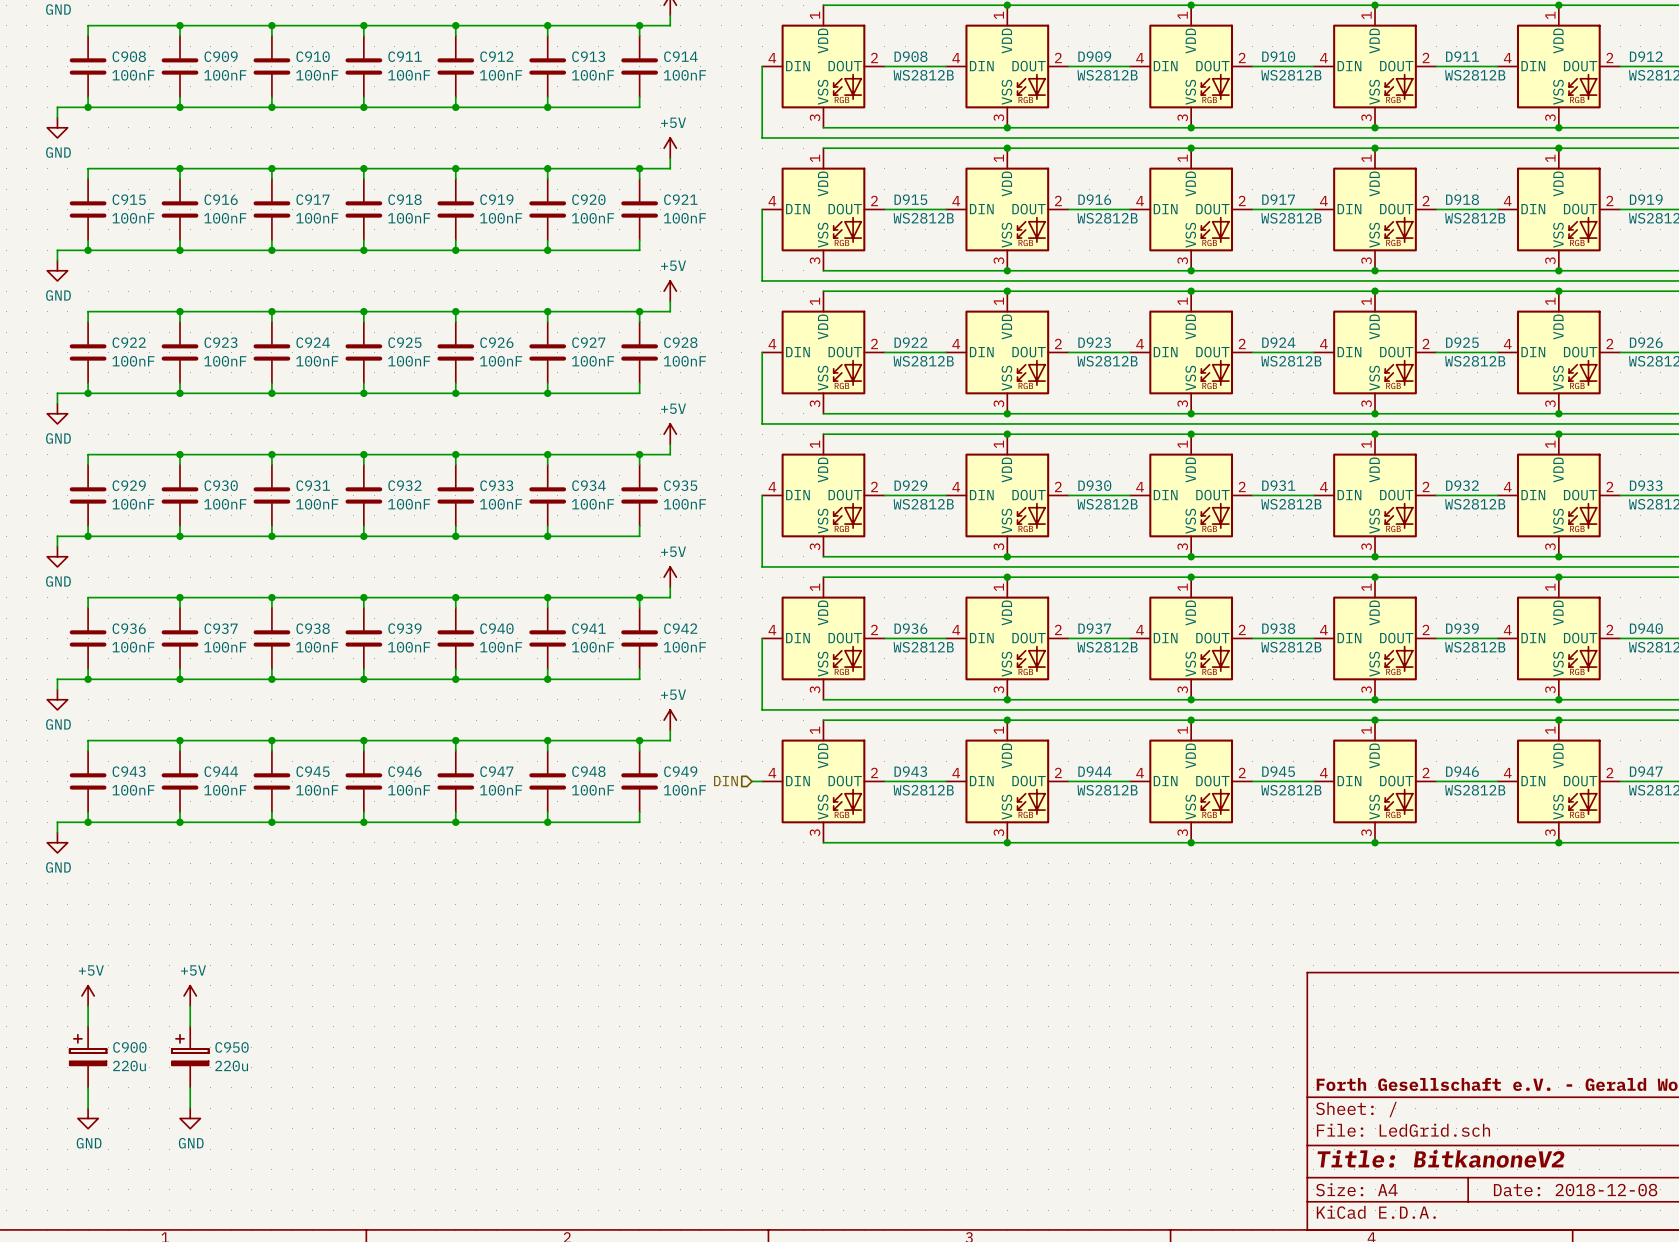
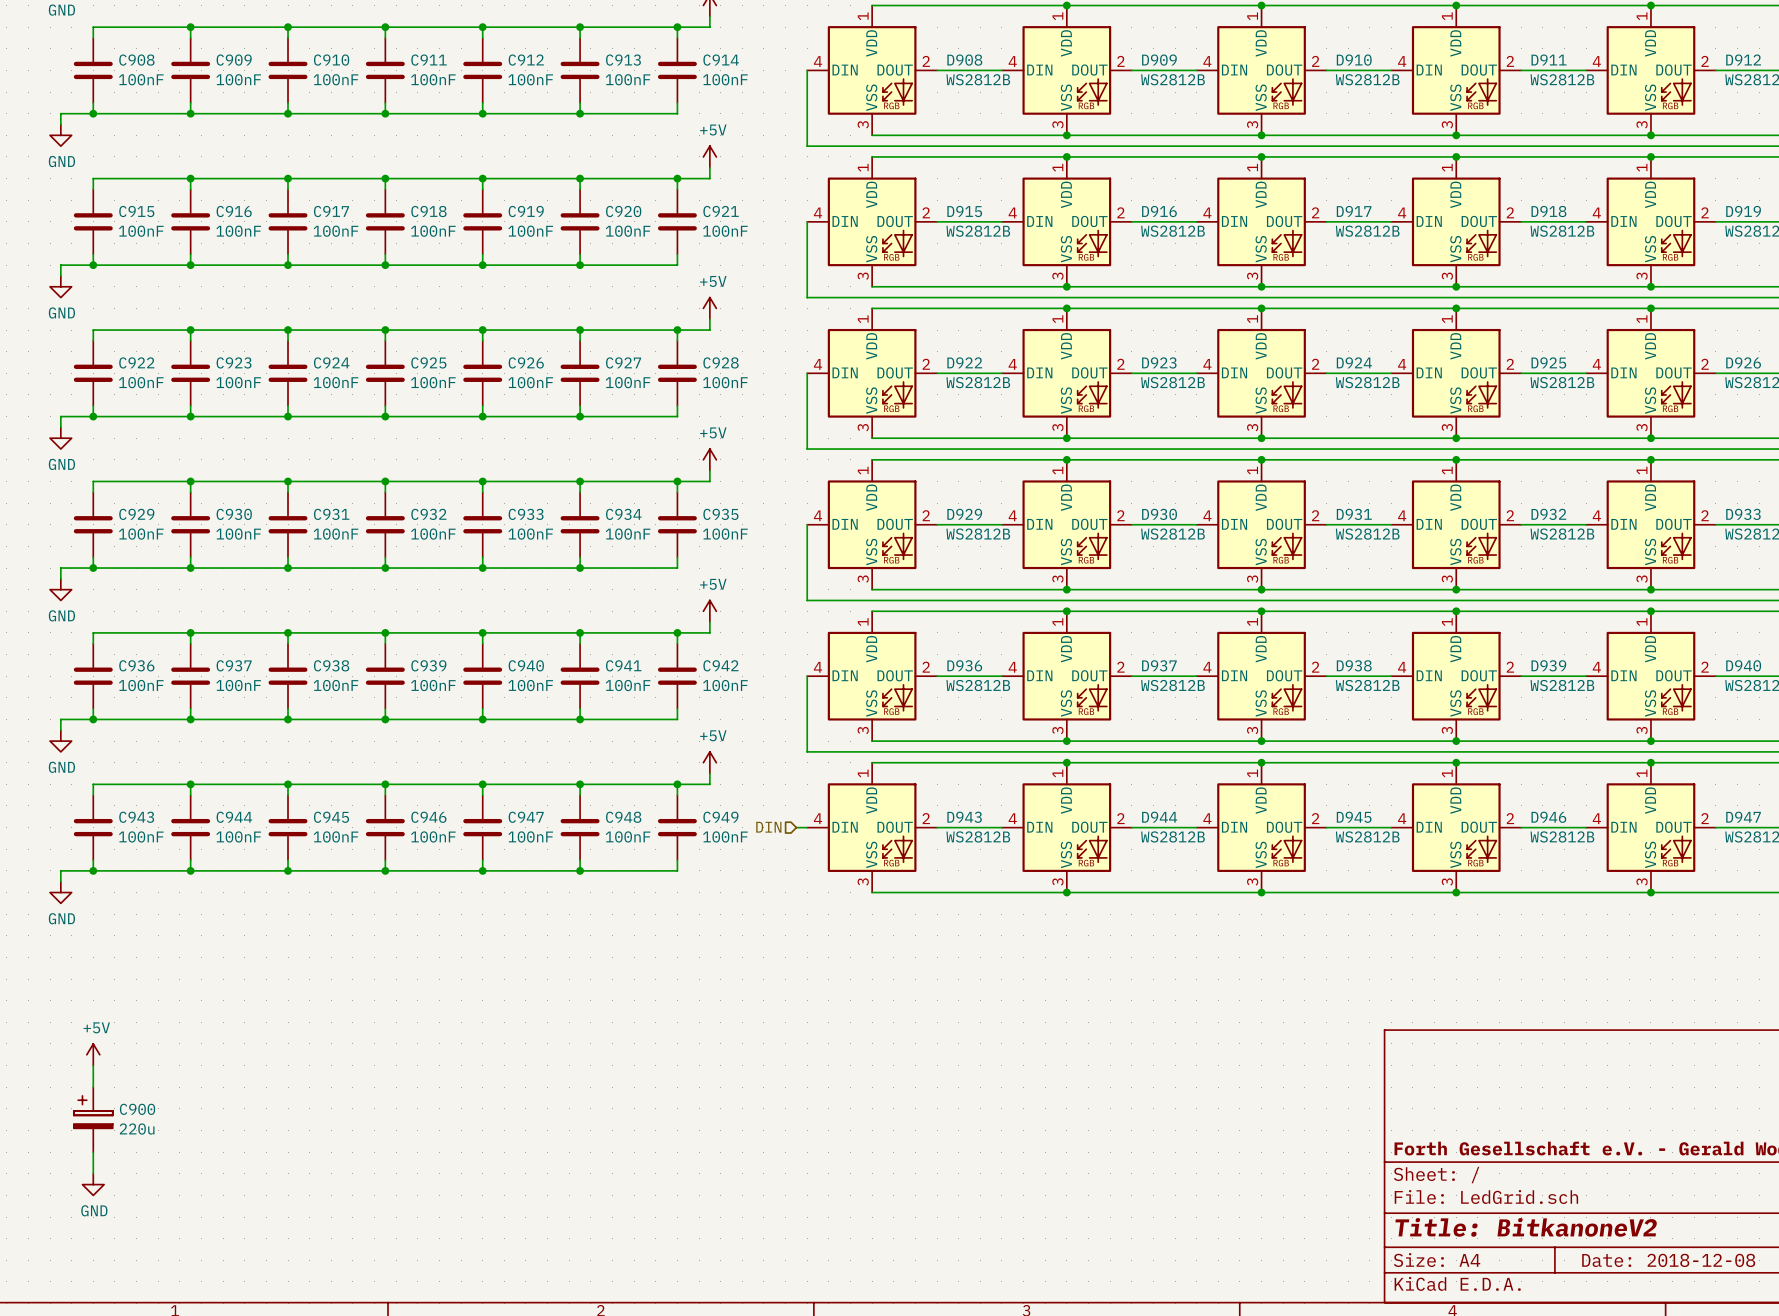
power symbol: +5V (190, 995) -> none
wire: (190, 1006) (190, 1026) -> none
C950: 220u (190, 1057) -> none
wire: (190, 1087) (190, 1108) -> none
power symbol: GND (190, 1118) -> none

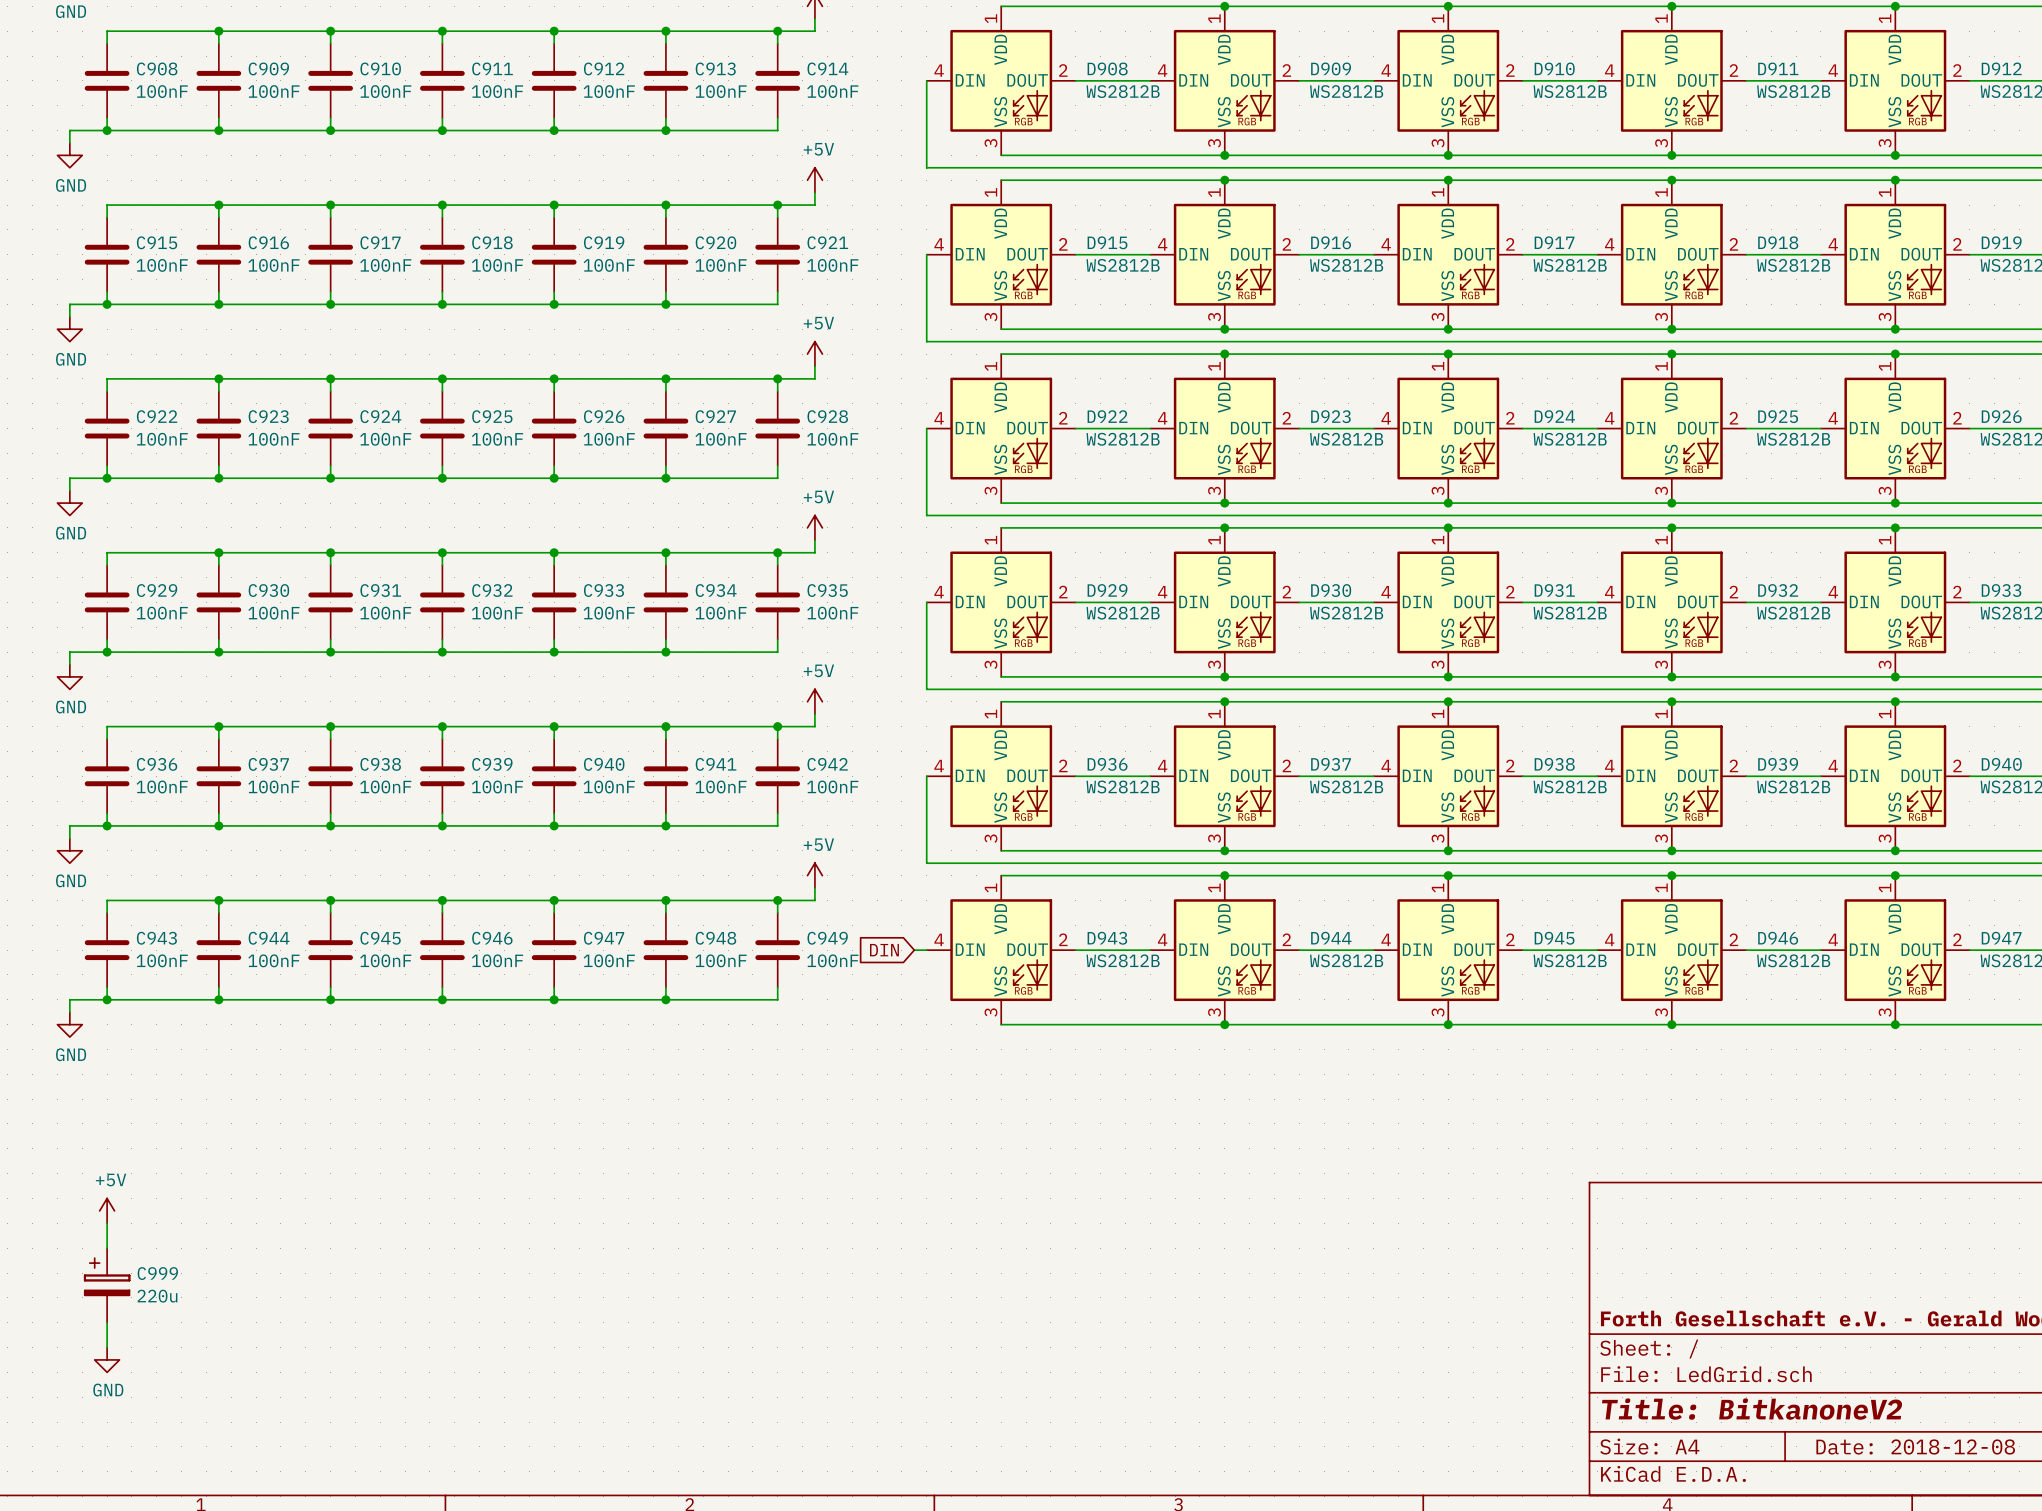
hierarchical label: DIN (768, 827) -> none
global label: none -> DIN (884, 950)
C900 name: C900 (137, 1109) -> C999 (157, 1273)

